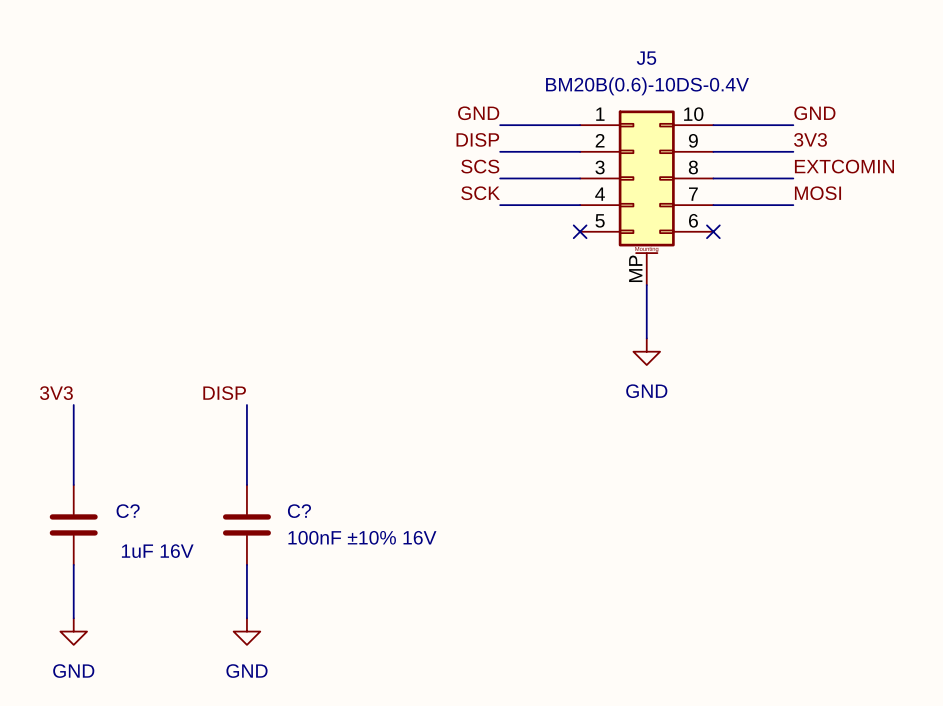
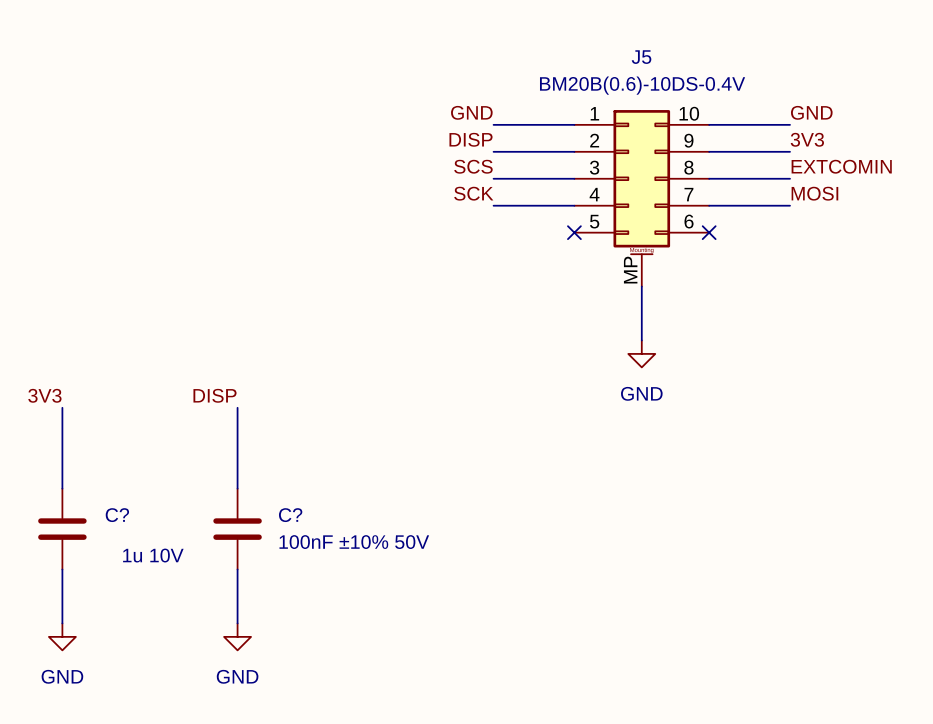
C? value: 100nF ±10% 16V (362, 537) -> 100nF ±10% 50V (354, 542)
C? value: 1uF 16V (157, 551) -> 1u 10V (153, 555)

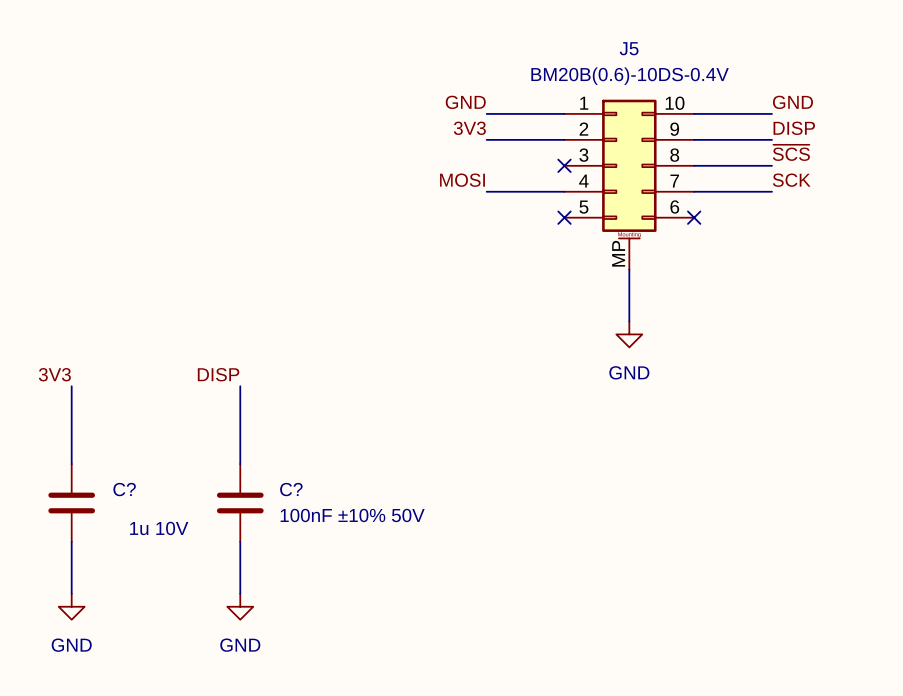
label: DISP (471, 139) -> 3V3 (469, 128)
label: 3V3 (807, 139) -> DISP (794, 128)
label: SCS (473, 166) -> none
label: EXTCOMIN (841, 166) -> ~{SCS} (791, 152)
wire: (493, 178) (574, 178) -> none
no-connect mark: none -> (564, 165)
label: SCK (473, 193) -> MOSI (462, 180)
label: MOSI (814, 193) -> SCK (791, 180)

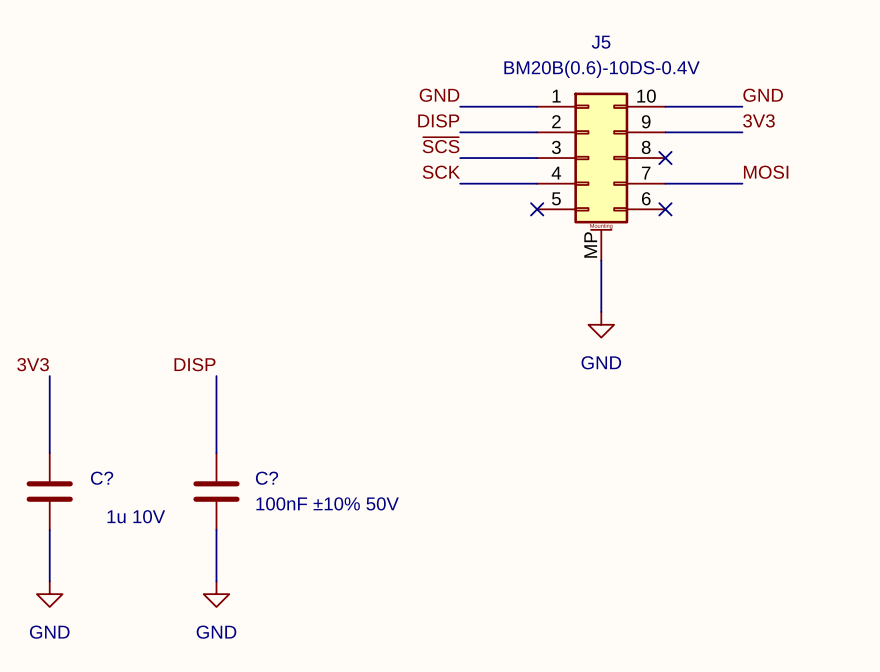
label: 3V3 (469, 128) -> DISP (438, 120)
label: DISP (794, 128) -> 3V3 (758, 120)
label: none -> ~{SCS} (441, 145)
label: ~{SCS} (791, 152) -> none
no-connect mark: (564, 165) -> none
wire: (694, 165) (771, 165) -> (460, 158) (537, 158)
no-connect mark: none -> (665, 158)
label: MOSI (462, 180) -> SCK (441, 172)
label: SCK (791, 180) -> MOSI (766, 172)

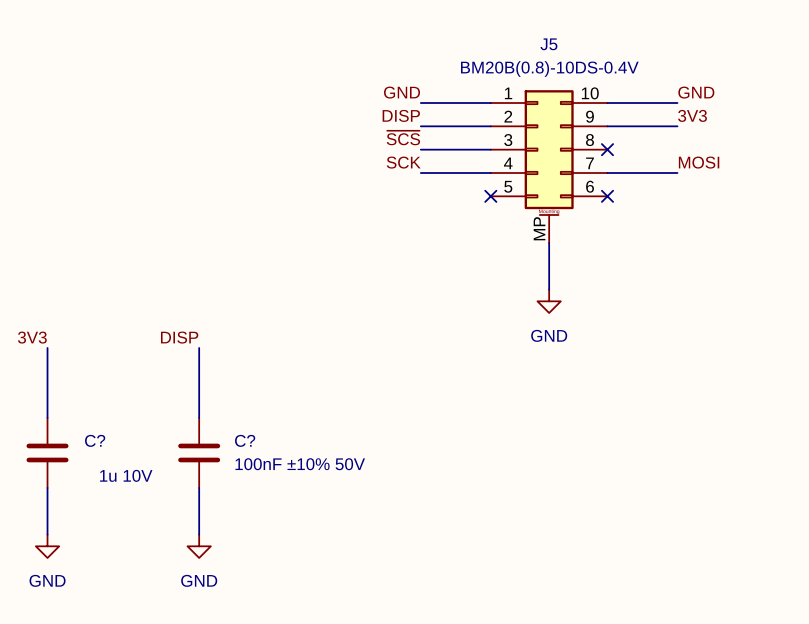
J5 value: BM20B(0.6)-10DS-0.4V (602, 69) -> BM20B(0.8)-10DS-0.4V (549, 69)

